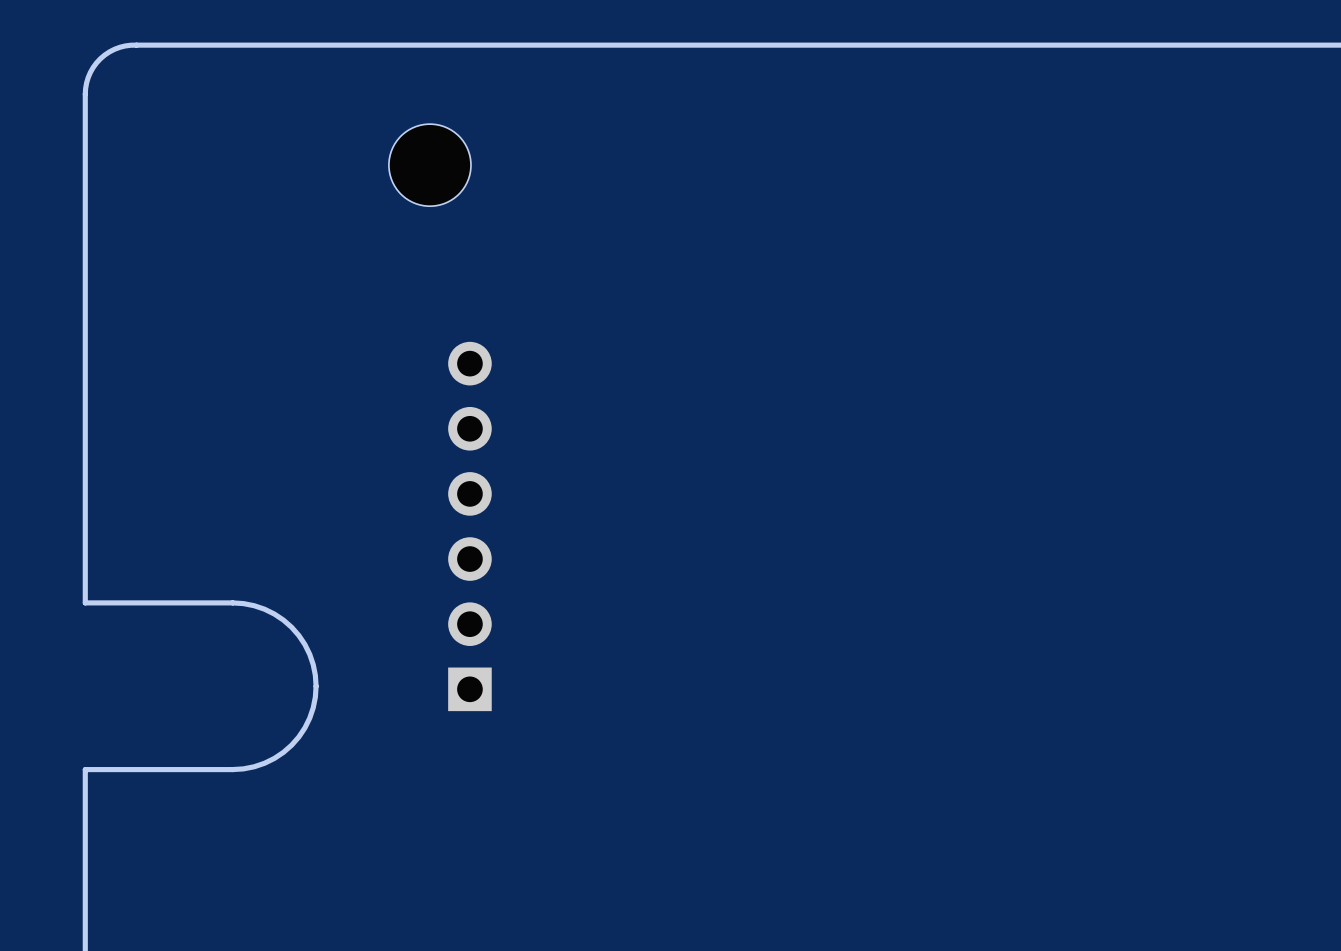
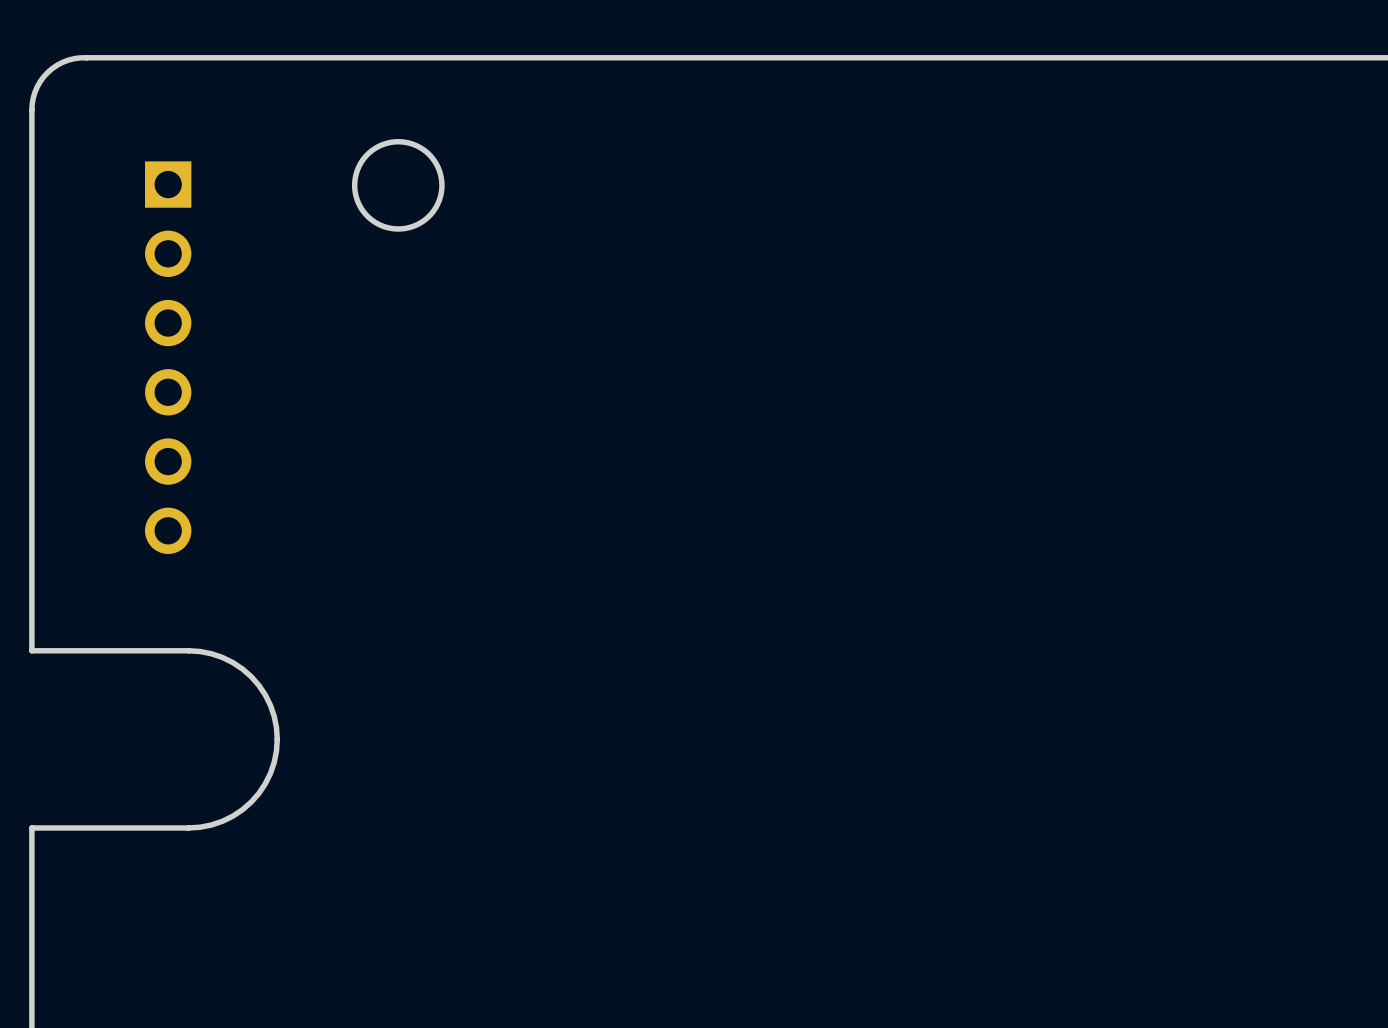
round board edge: none -> [351, 139, 445, 232]
part: (429, 165) -> none
part rotation: 0° (469, 526) -> 180° (168, 357)
part position: (469, 526) -> (168, 357)

